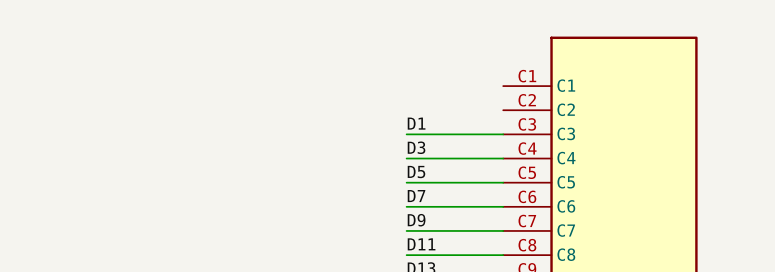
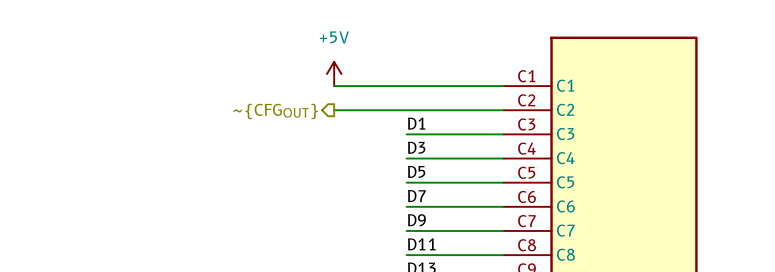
power symbol: none -> +5V (334, 74)
wire: none -> (334, 86) (503, 86)
hierarchical label: none -> ~{CFGOUT} (275, 111)
wire: none -> (334, 110) (503, 110)

